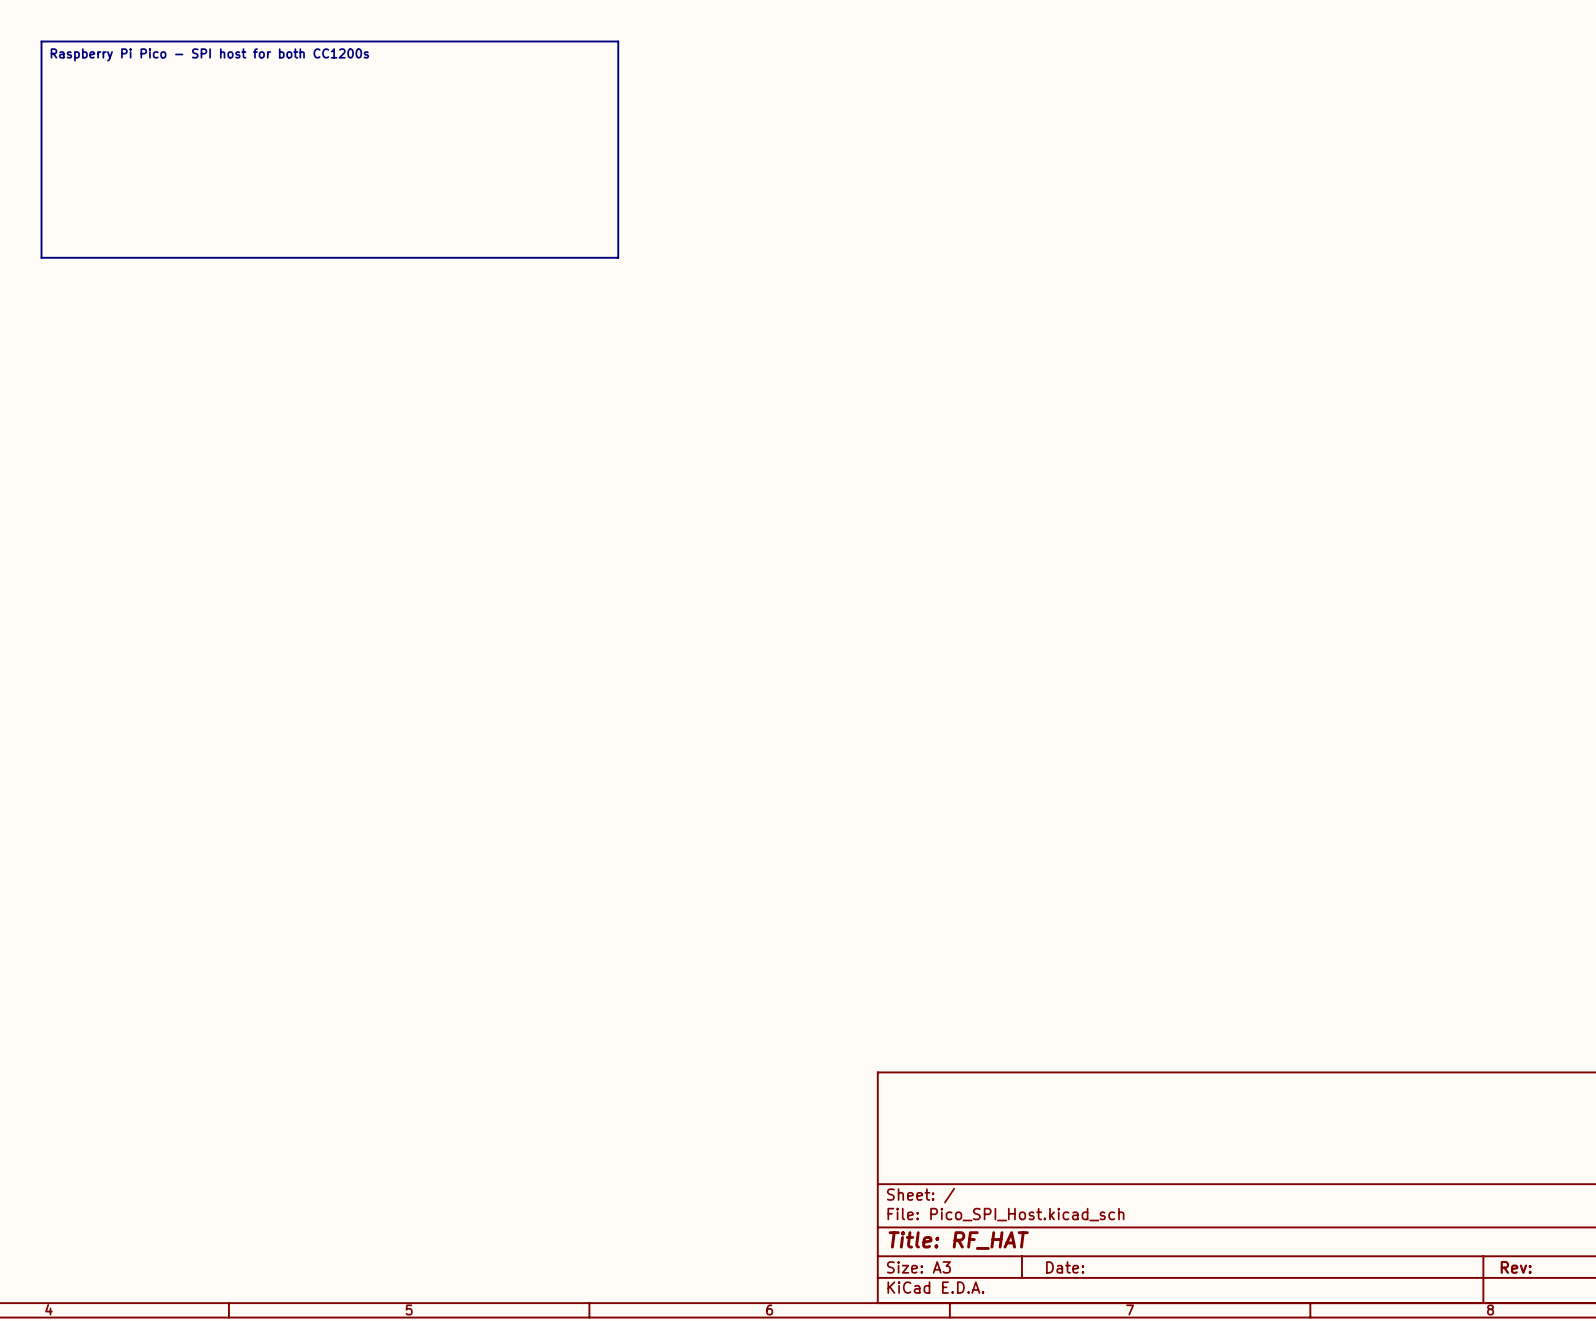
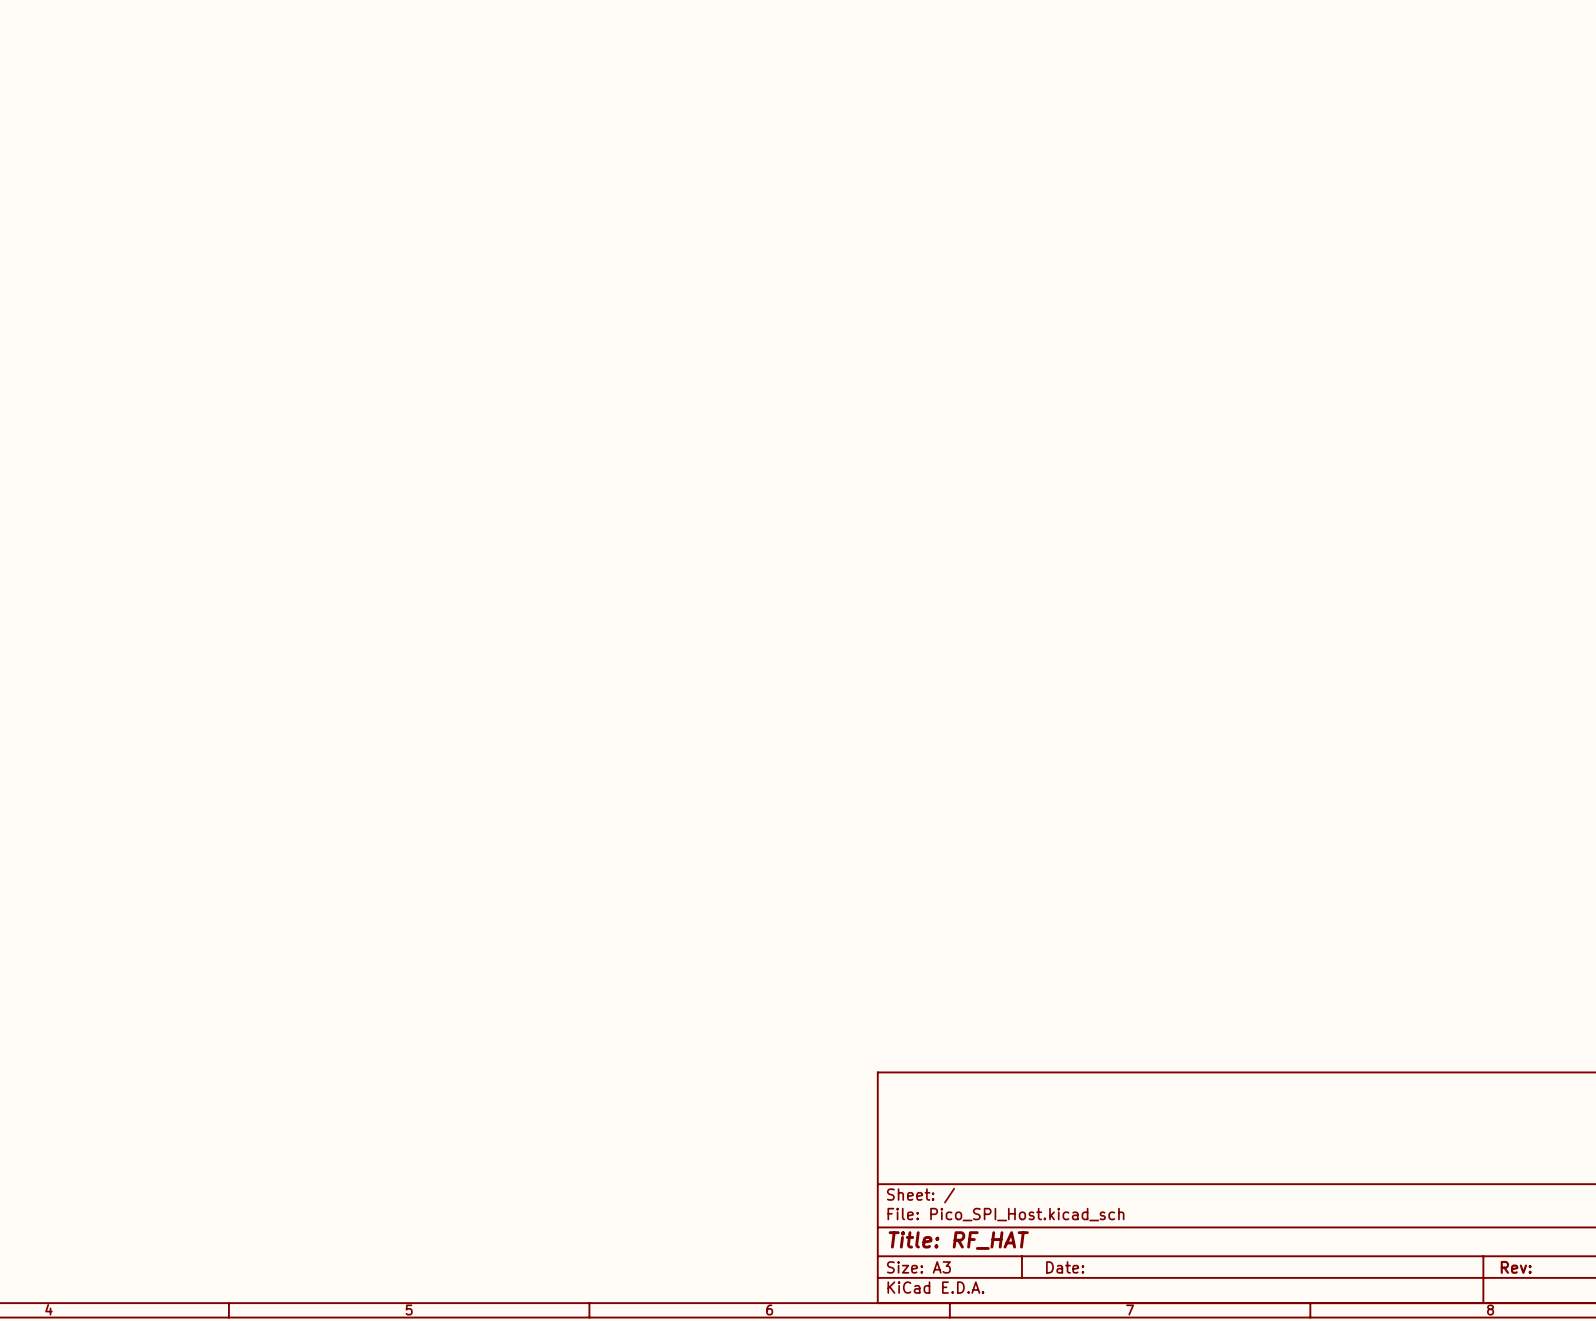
line: (41, 41) (618, 41) (618, 257) (41, 257) (41, 41) -> none
text: Raspberry Pi Pico - SPI host for both CC1200s (209, 54) -> none

